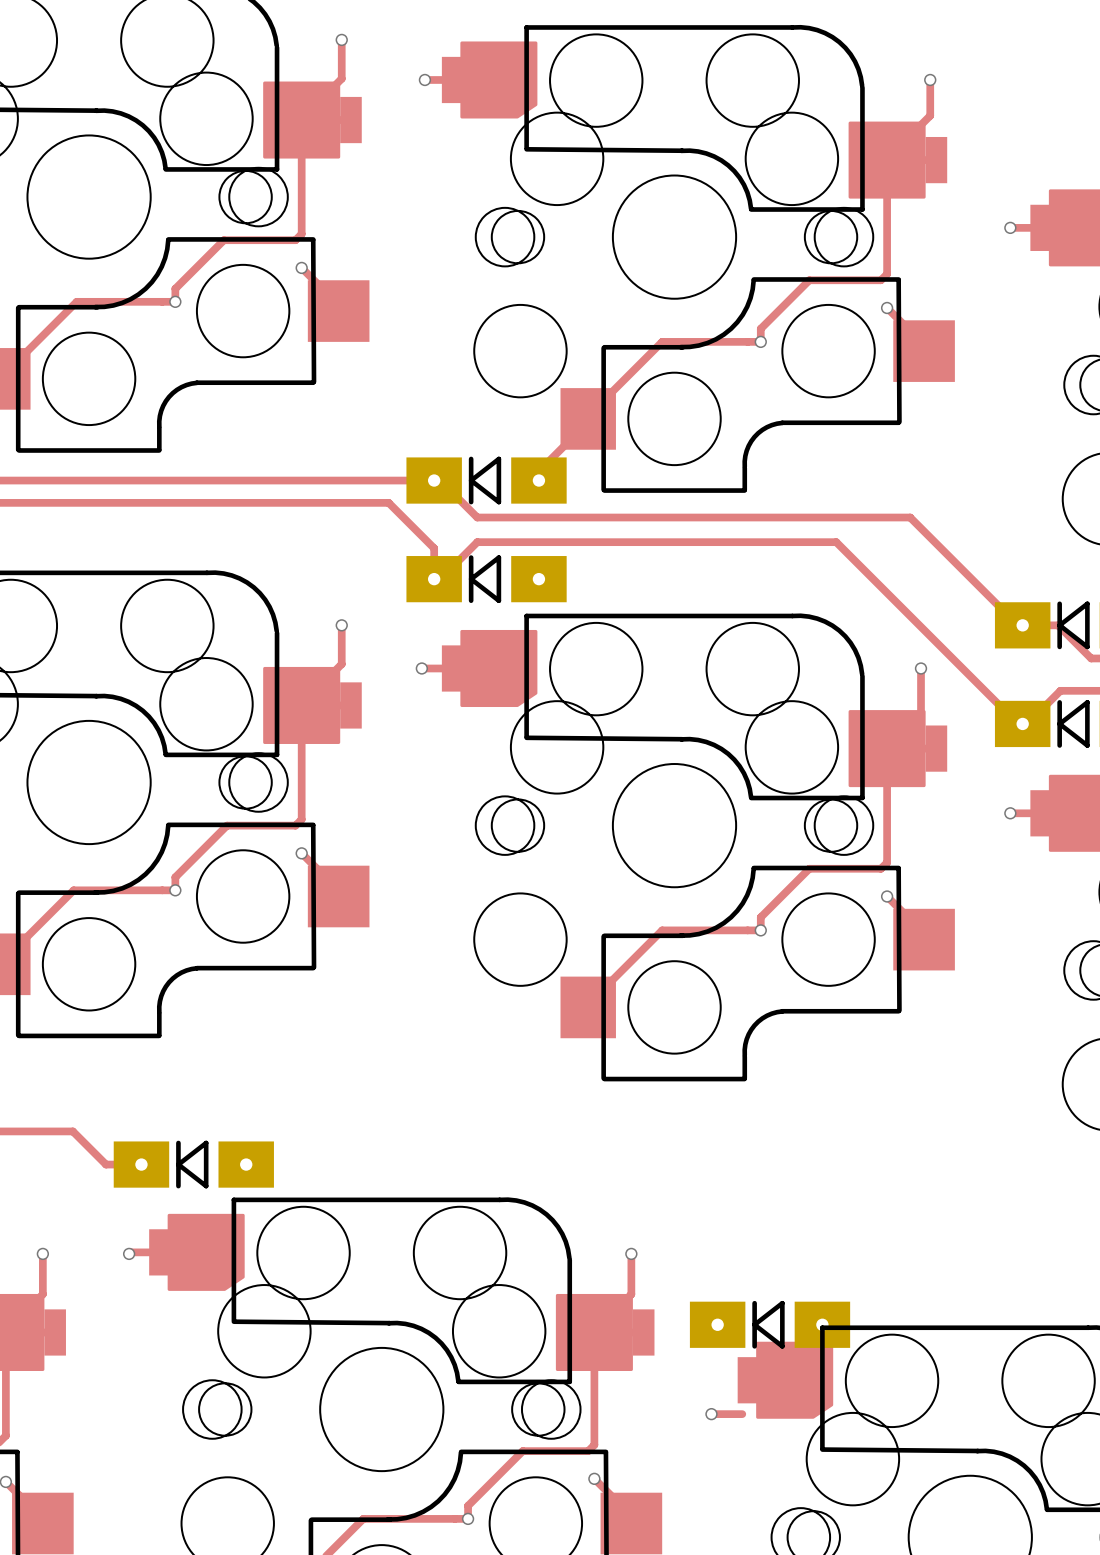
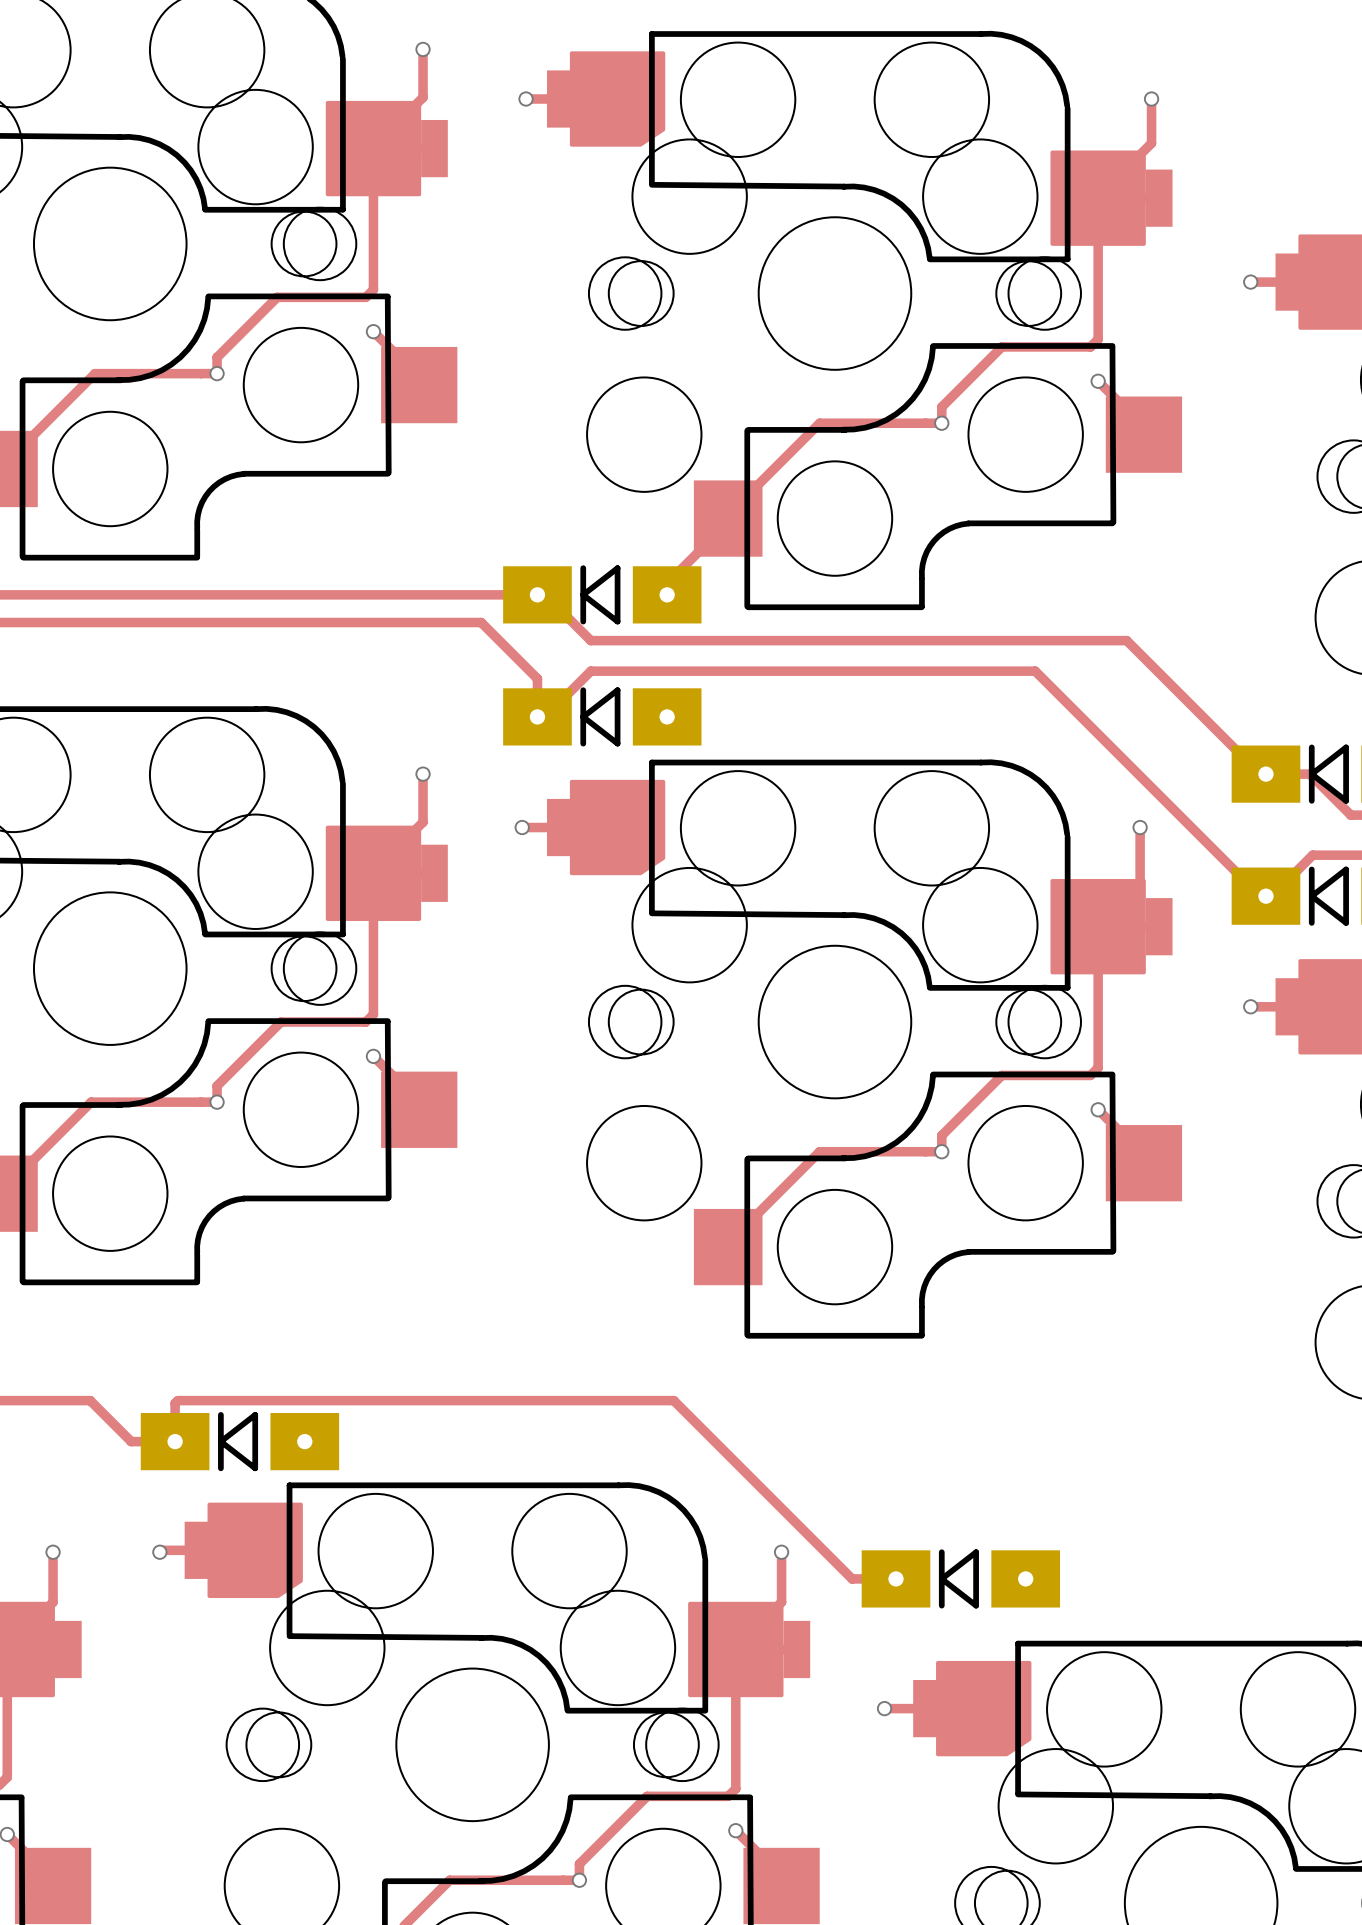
track: none -> (175, 1441) (175, 1403) (177, 1400) (673, 1400) (852, 1578) (896, 1578)
part position: (770, 1324) -> (960, 1578)
track: (711, 1414) (742, 1414) -> (888, 1708) (926, 1708)
via position: (711, 1414) -> (884, 1708)

